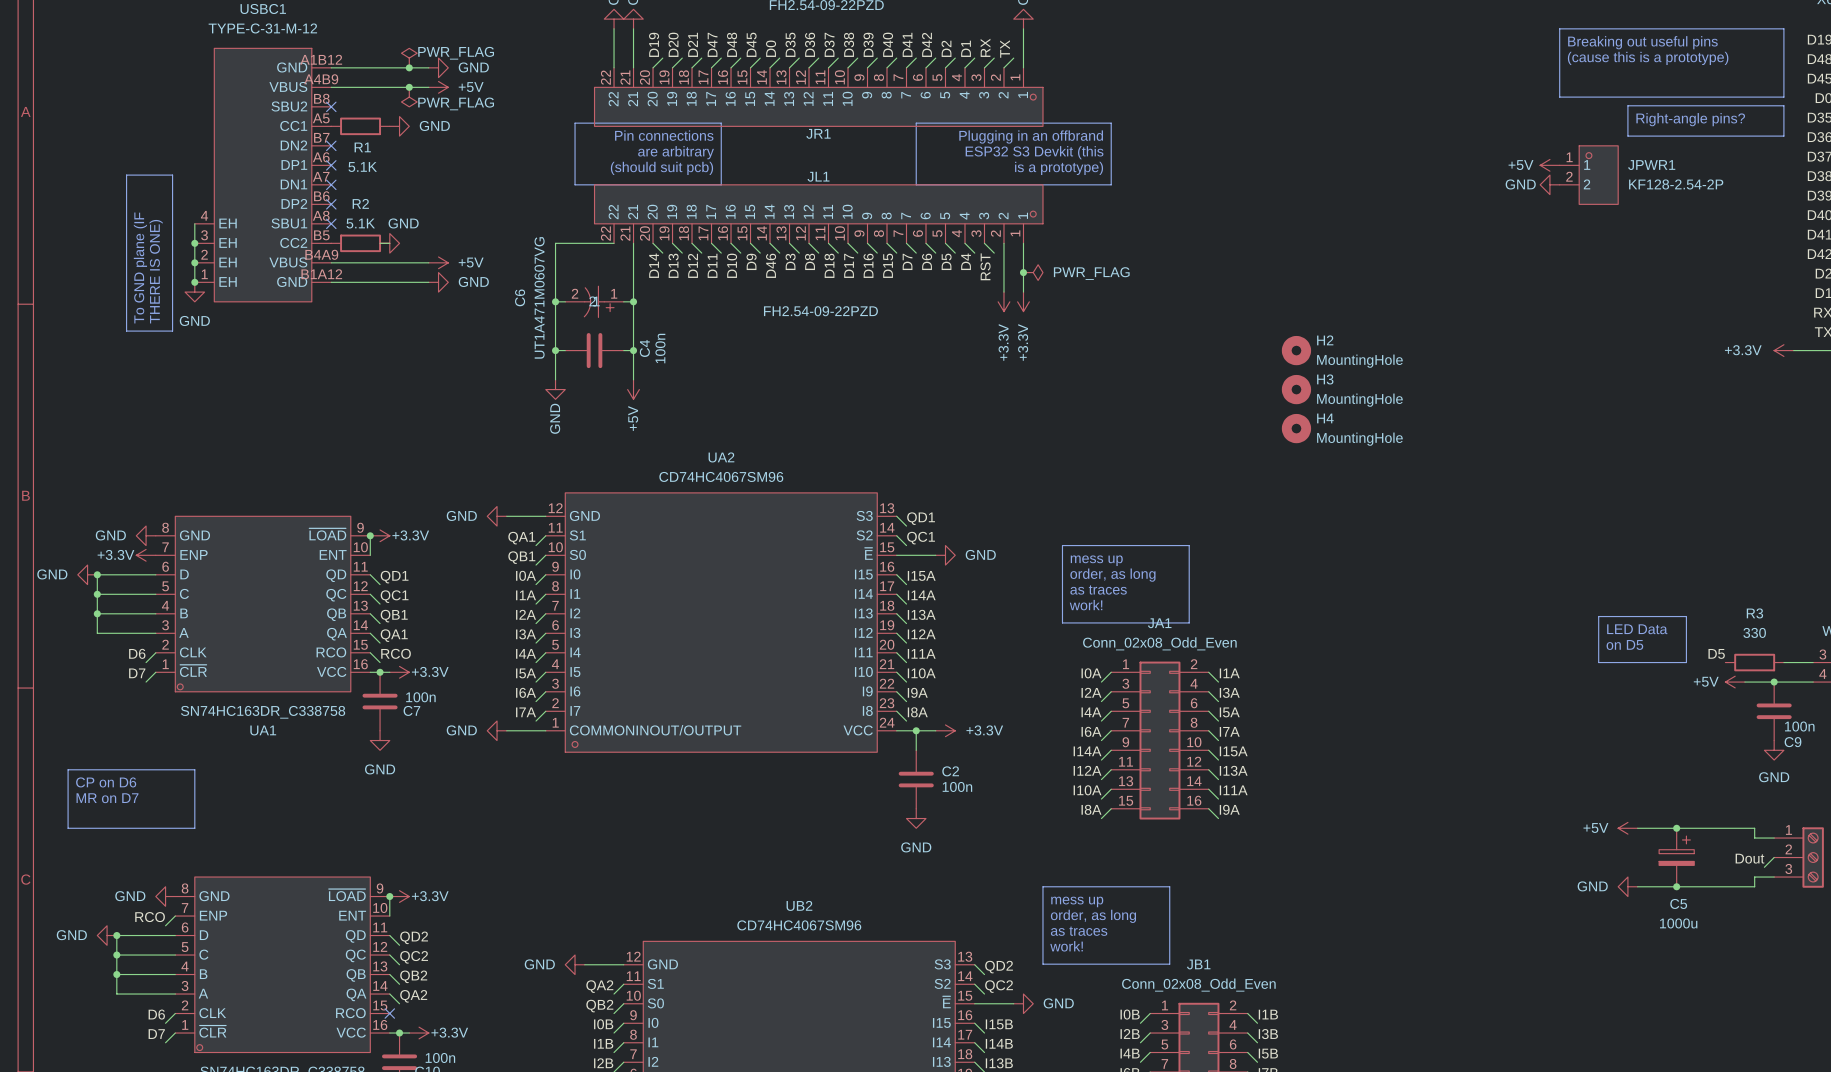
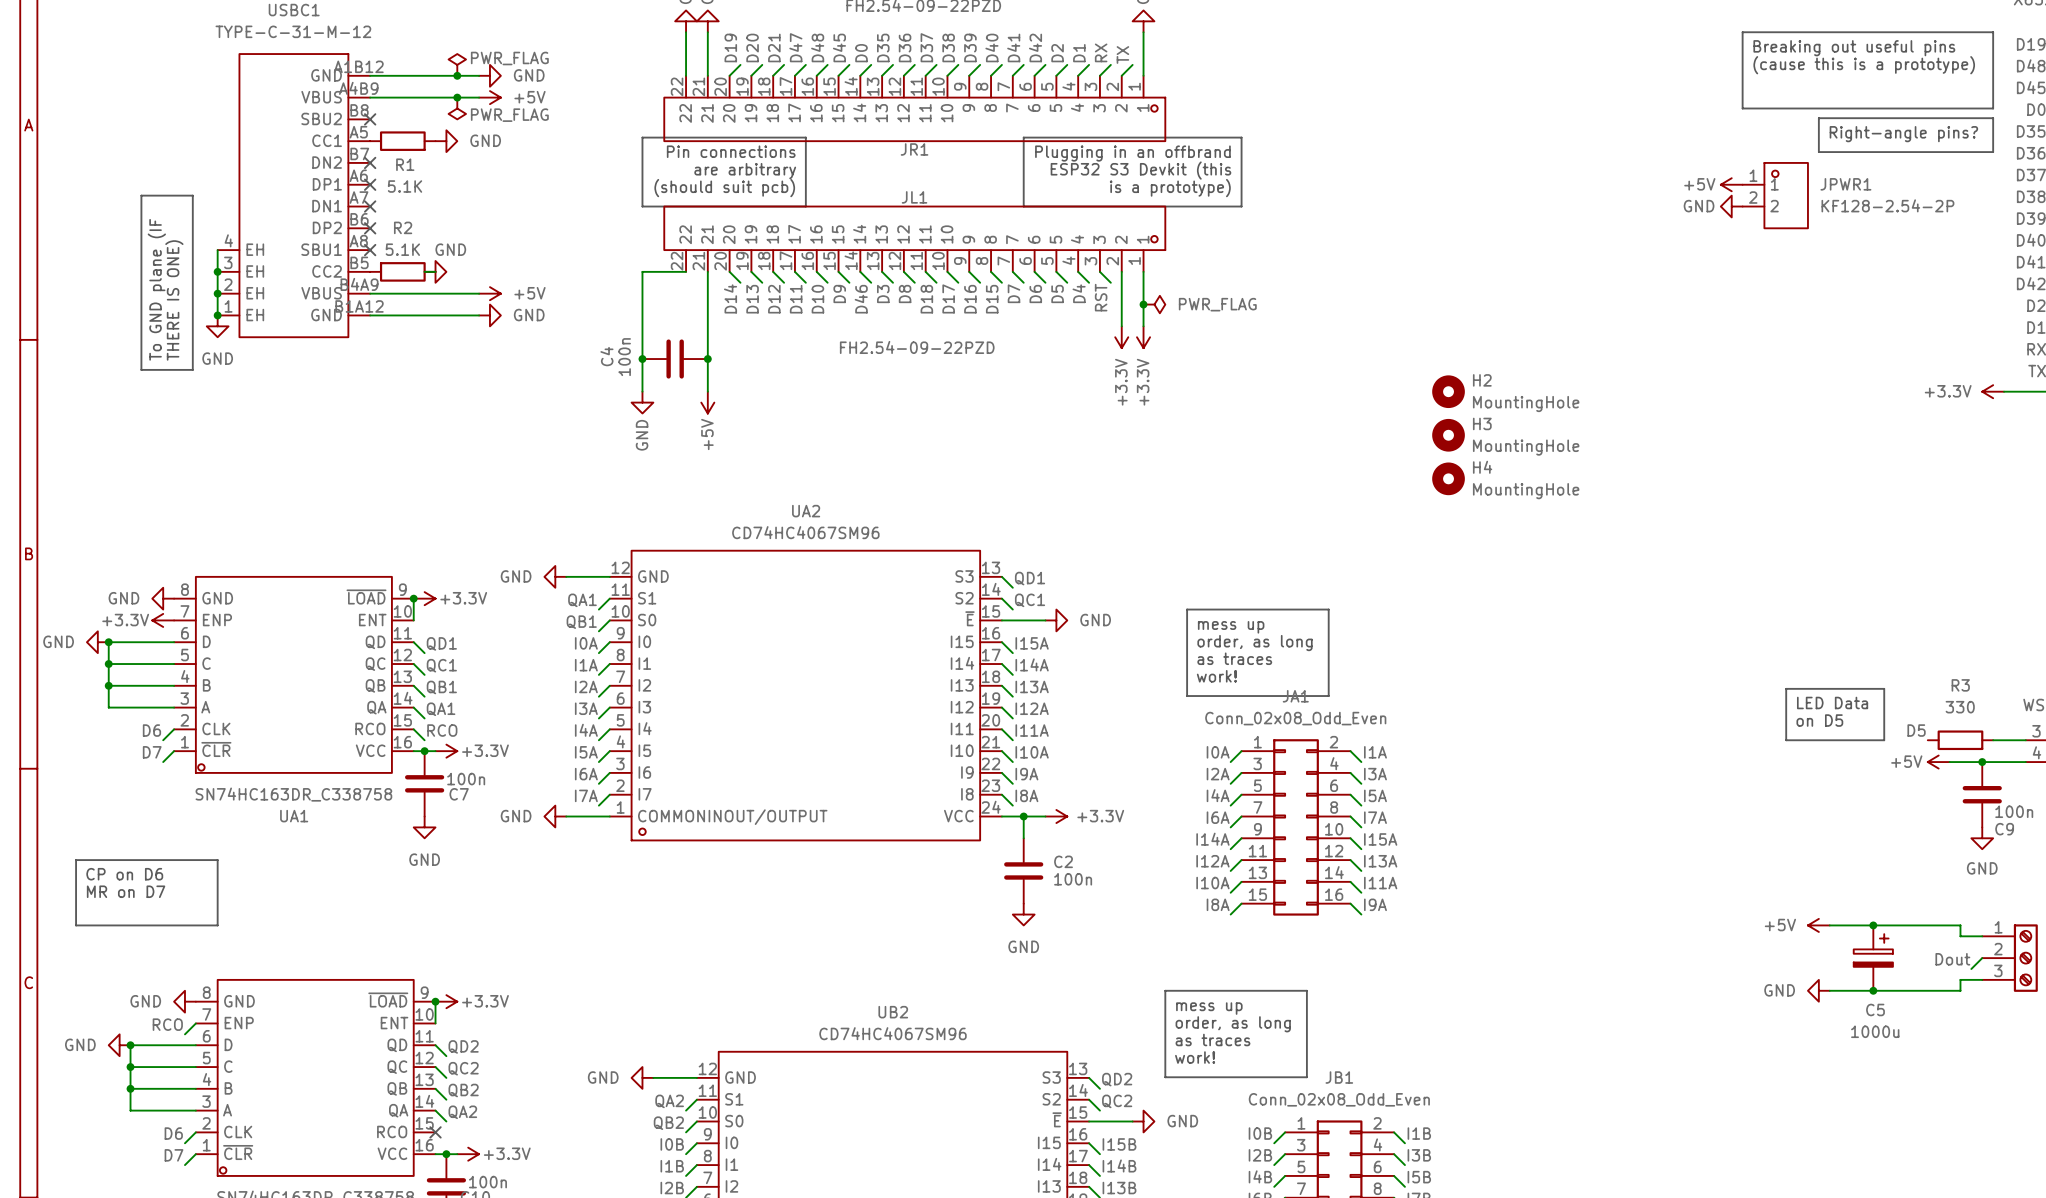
wire: (575, 243) (555, 243) (555, 379) -> (642, 271) (642, 391)
wire: (555, 301) (565, 301) -> none
junction: (555, 301) -> none
C6: UT1A471M0607VG (594, 301) -> none
wire: (623, 301) (633, 301) -> none
junction: (633, 301) -> none
junction: none -> (642, 359)
junction: none -> (707, 359)
C4 name position: C4 (644, 348) -> C4 (606, 356)
C4 value position: 100n (660, 348) -> 100n (624, 357)
wire: (555, 350) (565, 350) -> none
junction: (555, 350) -> none
C4 position: (594, 350) -> (675, 359)
junction: (633, 350) -> none
power symbol position: GND (555, 389) -> GND (642, 402)
power symbol position: +5V (633, 389) -> +5V (707, 402)

